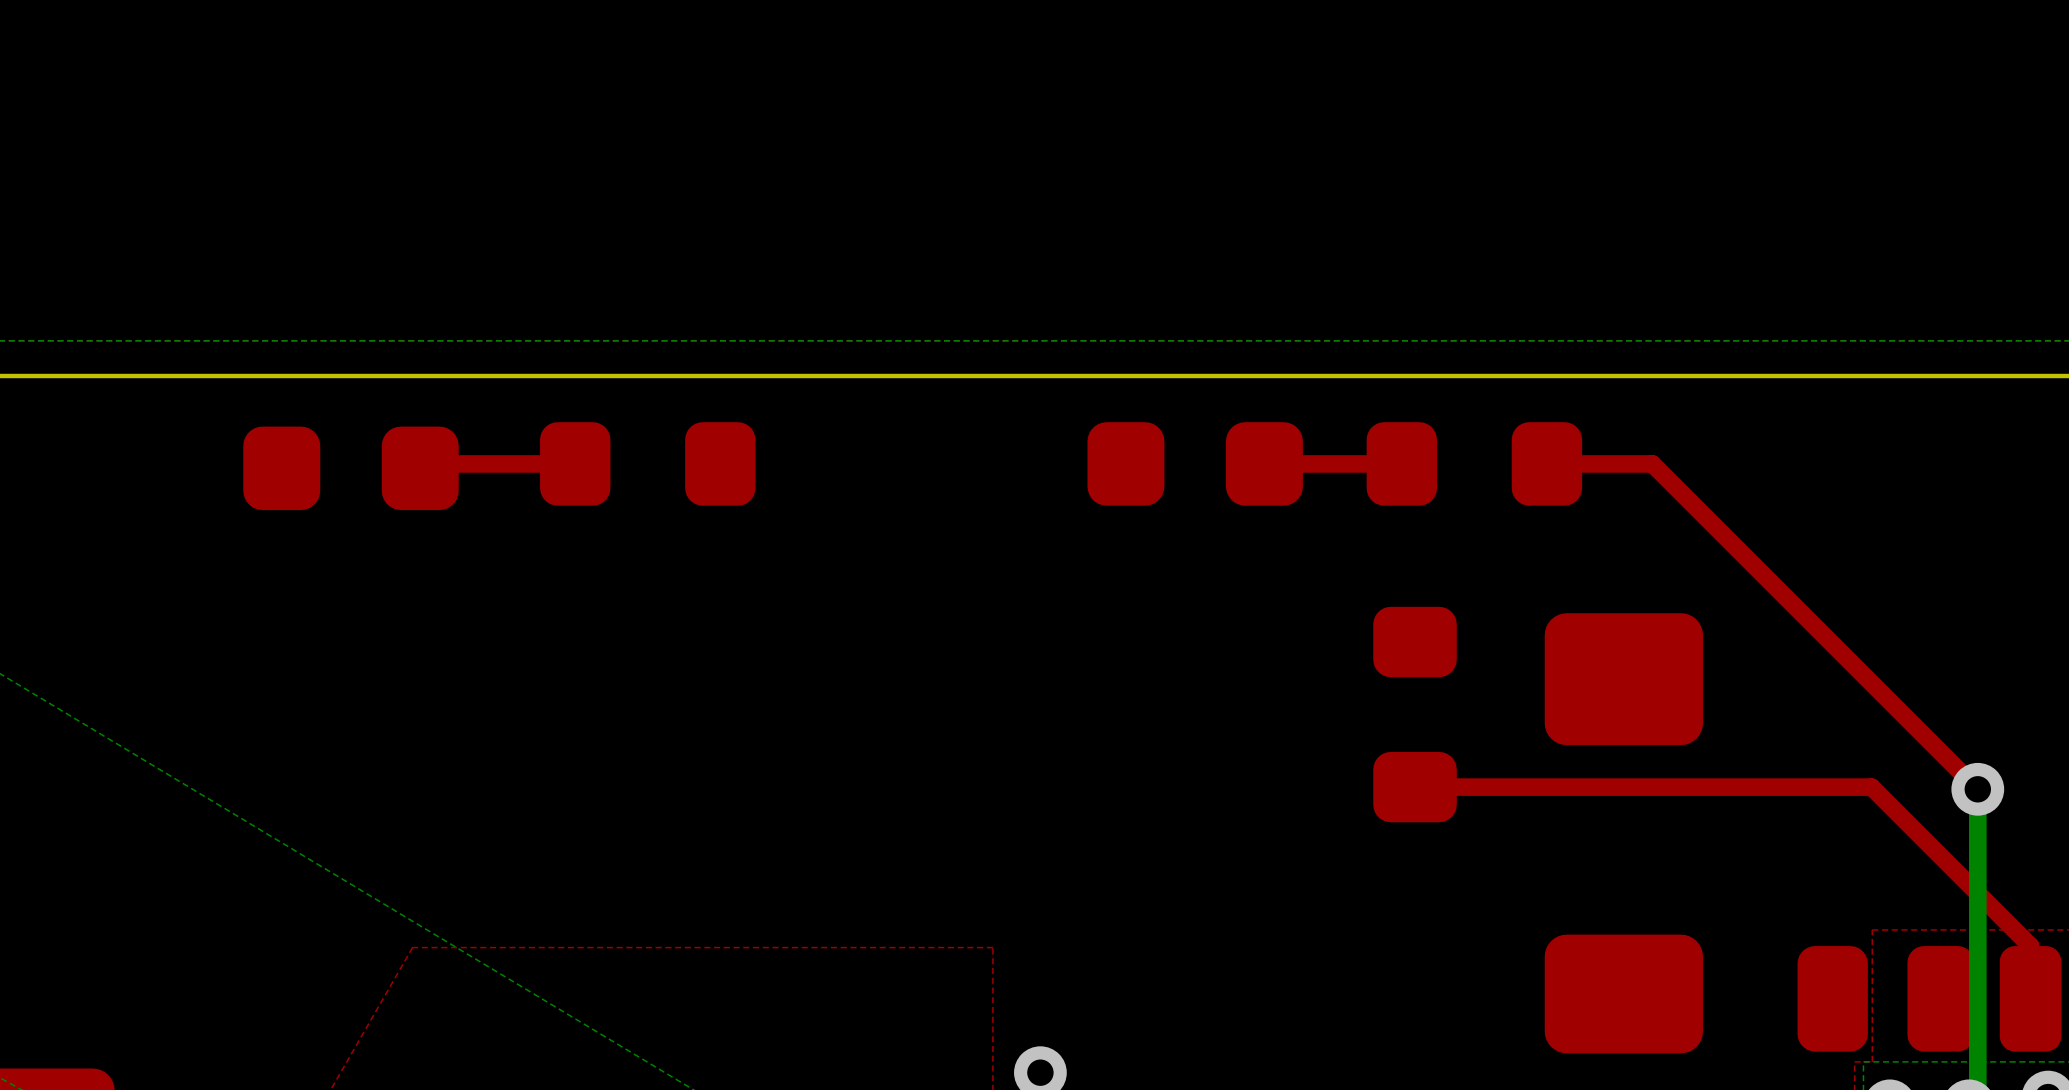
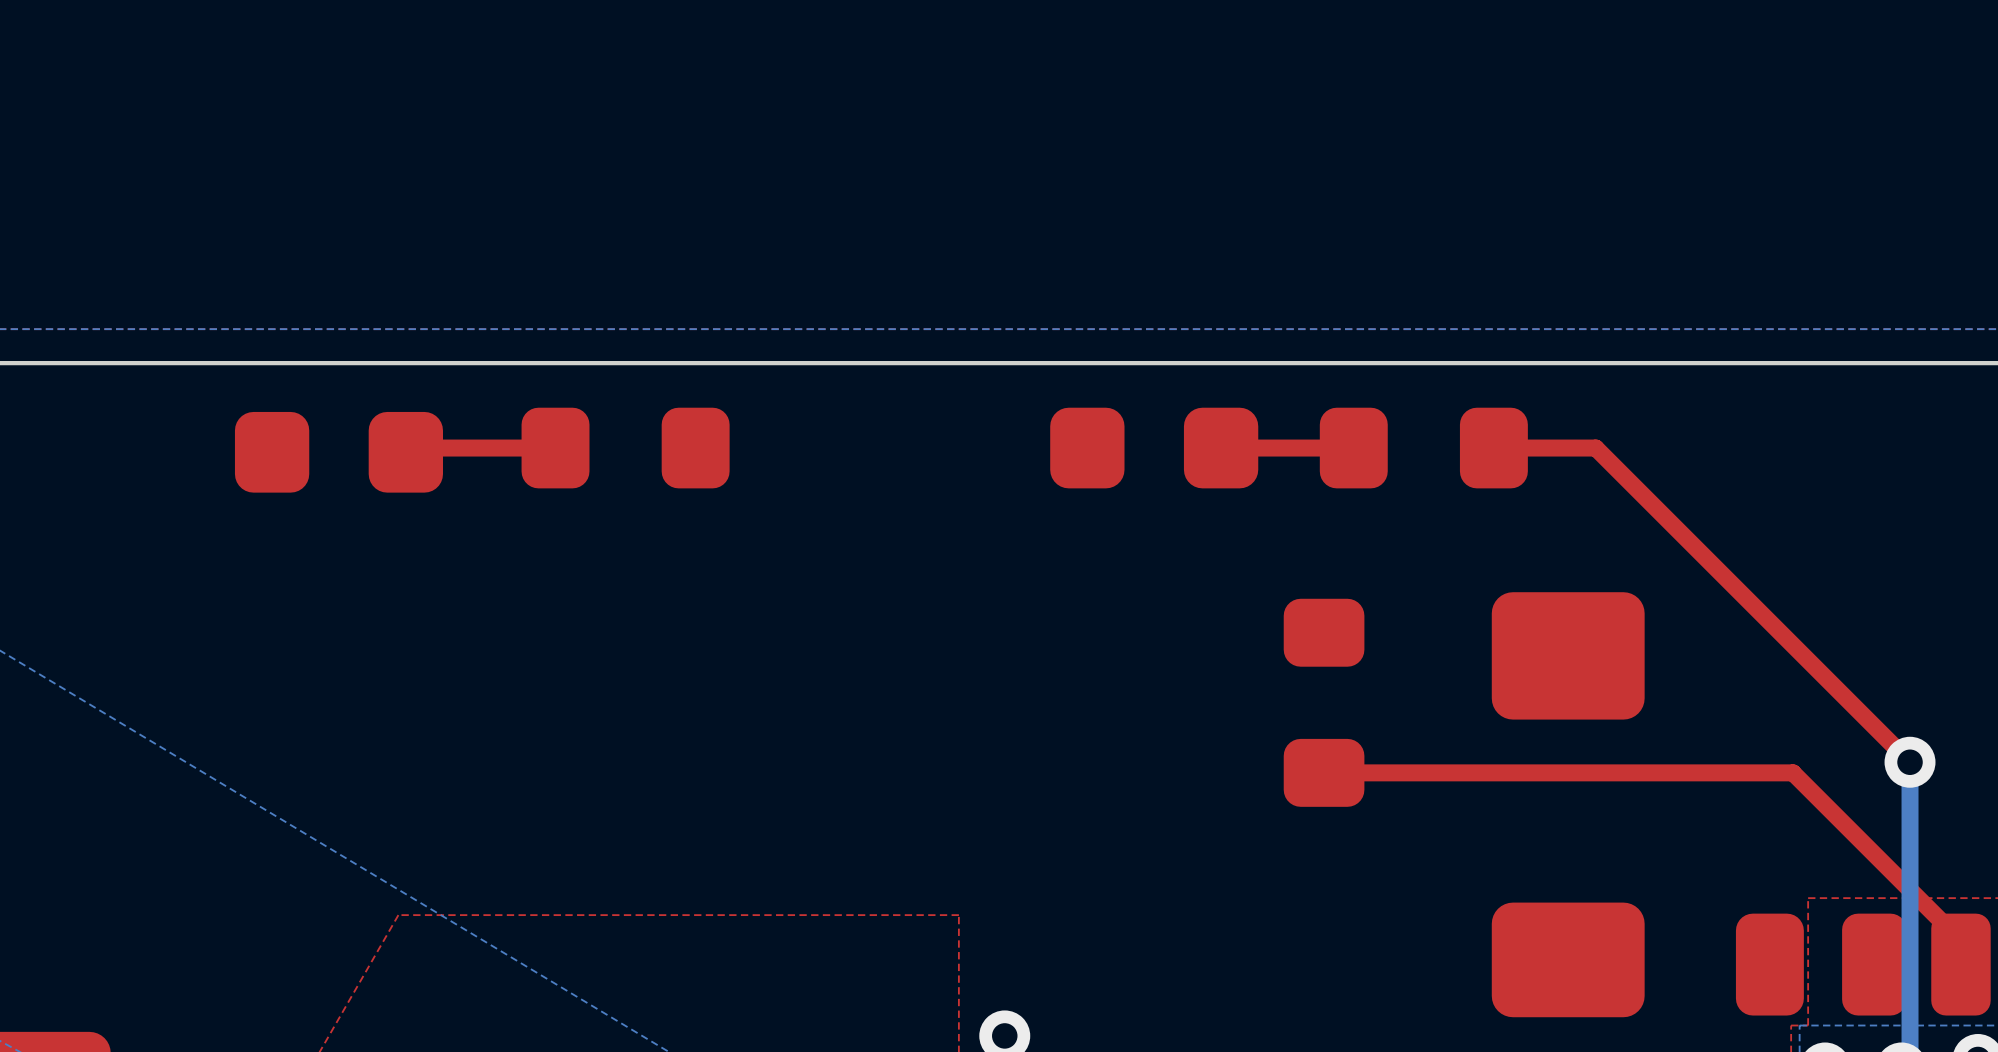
part position: (1415, 714) -> (1324, 702)
top track: (1415, 787) (1871, 787) (2030, 946) (2030, 974) -> (1324, 772) (1793, 772) (1960, 940)

